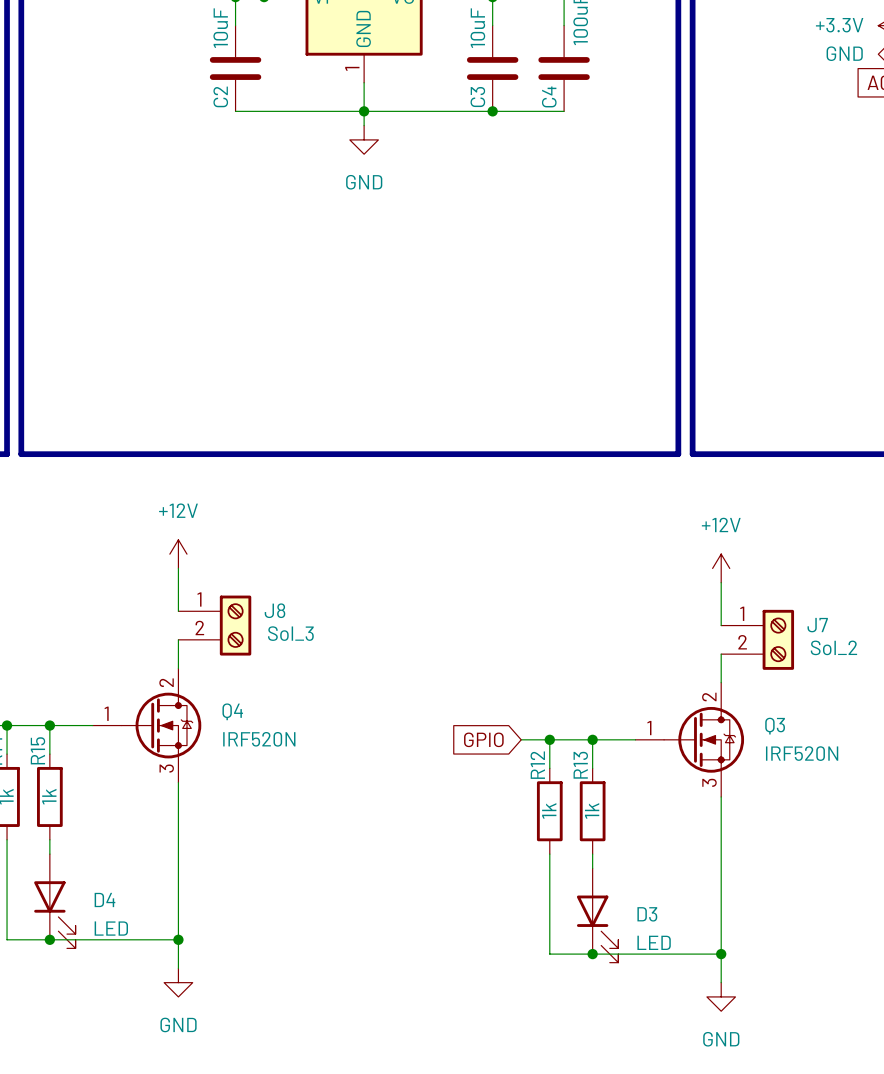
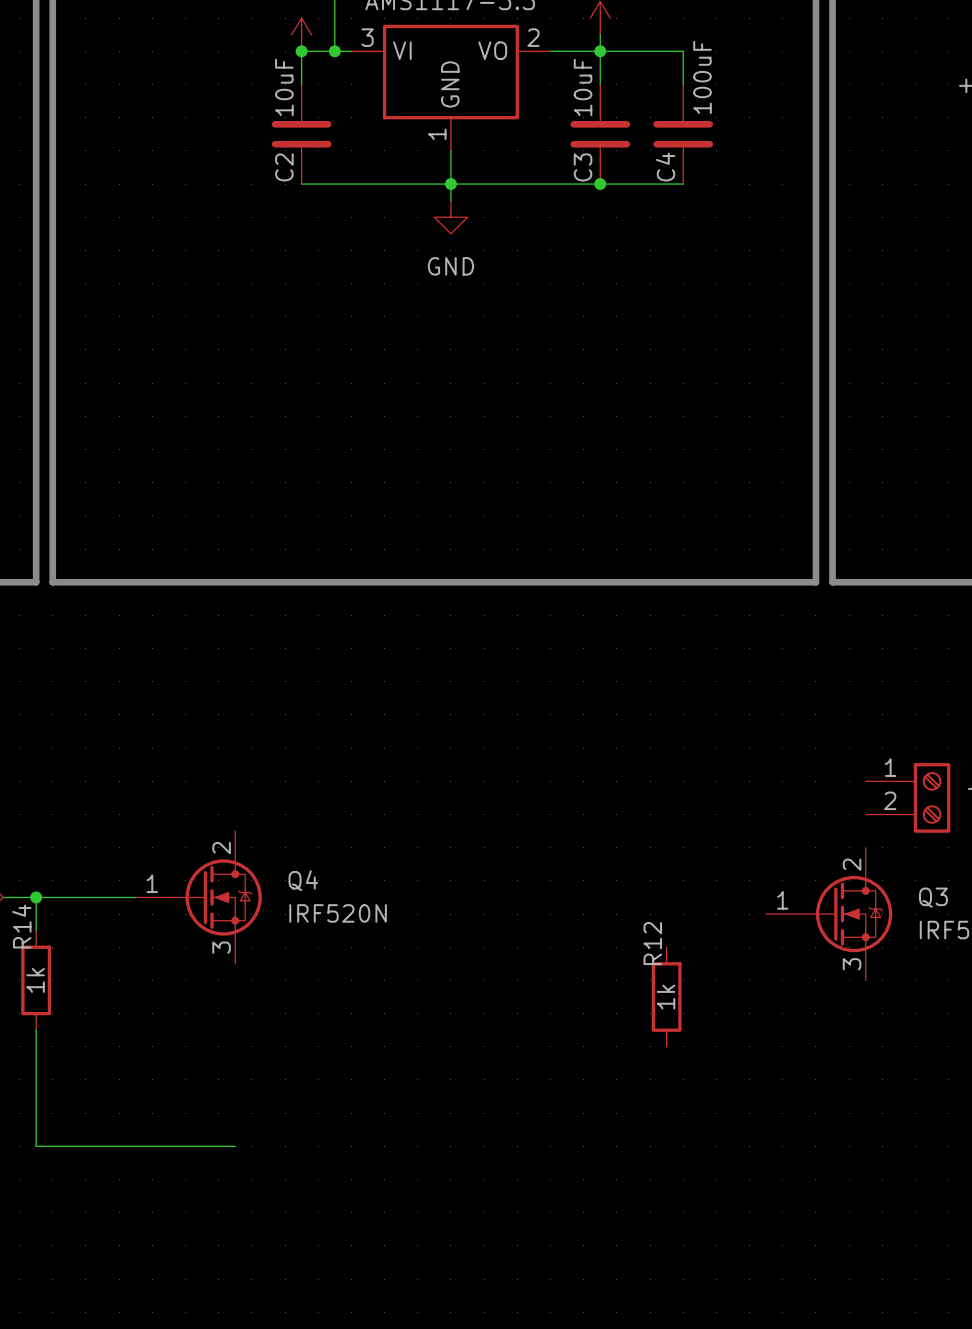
power symbol: +12V (178, 554) -> none
wire: (178, 568) (178, 611) -> none
power symbol: +12V (721, 568) -> none
wire: (721, 582) (721, 625) -> none
J8: Sol_3 (214, 625) -> none
wire: (178, 639) (178, 668) -> none
wire: (721, 654) (721, 682) -> none
wire: (49, 725) (49, 754) -> none
junction: (49, 725) -> none
global label: GPIO (483, 739) -> none
wire: (521, 739) (635, 739) -> none
wire: (549, 739) (549, 768) -> none
junction: (549, 739) -> none
wire: (592, 739) (592, 768) -> none
junction: (592, 739) -> none
wire: (178, 782) (178, 968) -> none
R15: 1k (49, 796) -> none
wire: (721, 796) (721, 982) -> none
R13: 1k (592, 811) -> none
wire: (49, 839) (49, 854) -> none
wire: (549, 854) (549, 954) (721, 954) -> none
wire: (592, 854) (592, 868) -> none
D4: LED (54, 901) -> none
D3: LED (597, 915) -> none
junction: (49, 939) -> none
junction: (178, 939) -> none
junction: (592, 954) -> none
junction: (721, 954) -> none
power symbol: GND (178, 982) -> none
power symbol: GND (721, 996) -> none

